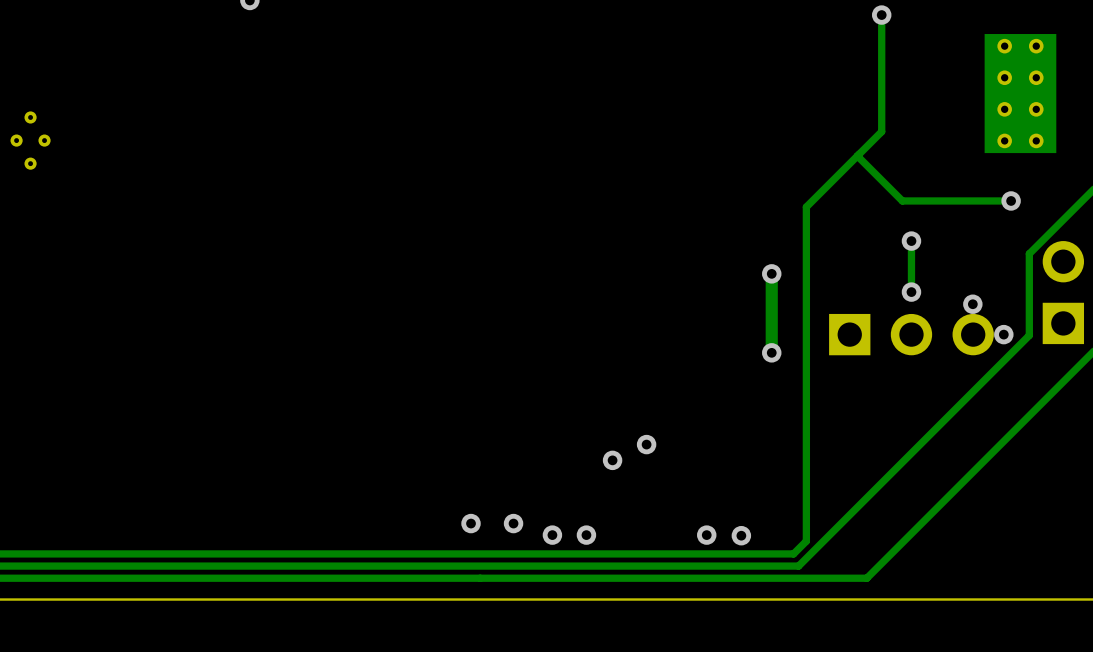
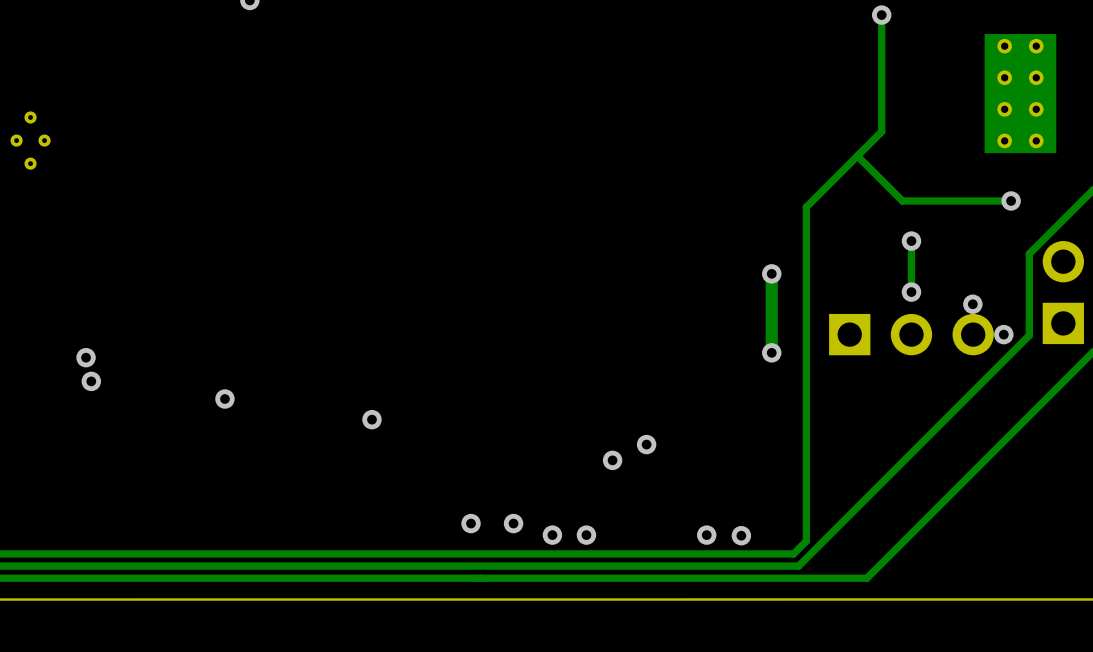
via: none -> (86, 357)
via: none -> (91, 381)
via: none -> (224, 399)
via: none -> (371, 419)

